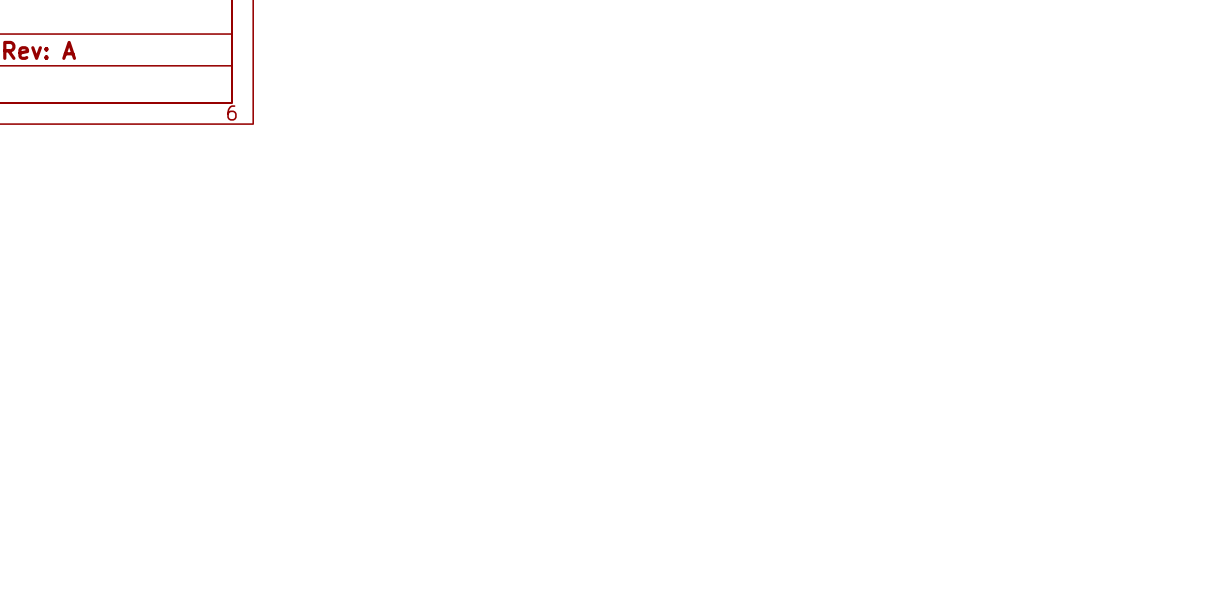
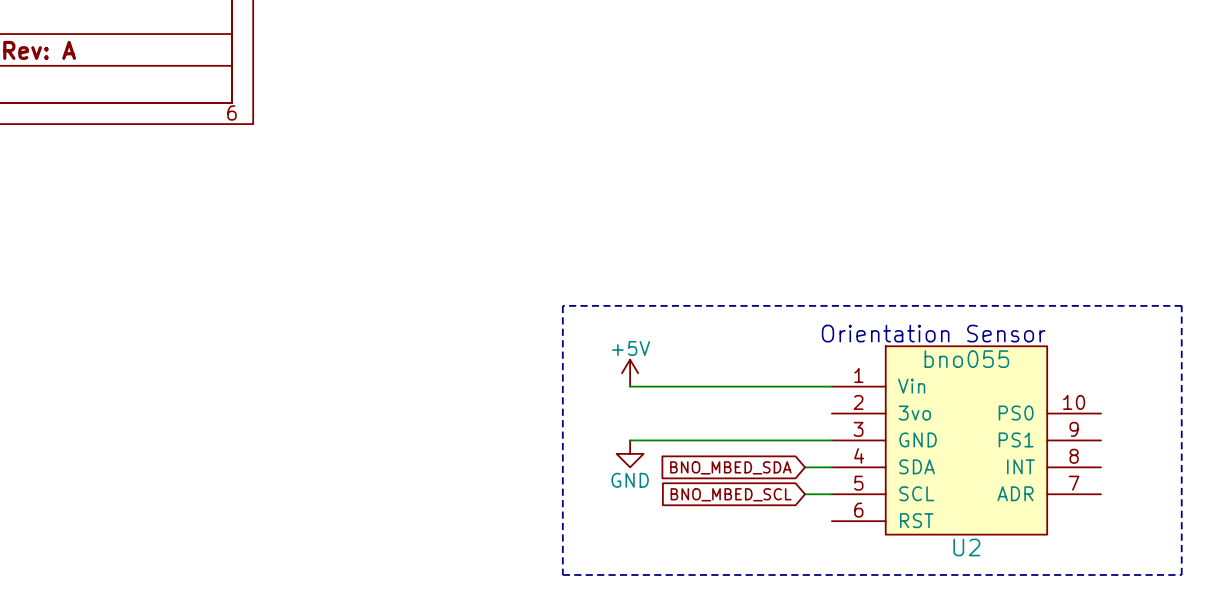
line: none -> (562, 305) (562, 574) (1181, 574) (1181, 305) (562, 305)
text: none -> Orientation Sensor (933, 333)
power symbol: none -> +5V (630, 373)
wire: none -> (630, 386) (831, 386)
wire: none -> (630, 440) (831, 440)
U2: none -> bno055 (966, 440)
power symbol: none -> GND (630, 453)
global label: none -> BNO_MBED_SDA (730, 467)
wire: none -> (805, 467) (831, 467)
global label: none -> BNO_MBED_SCL (731, 494)
wire: none -> (805, 494) (831, 494)

